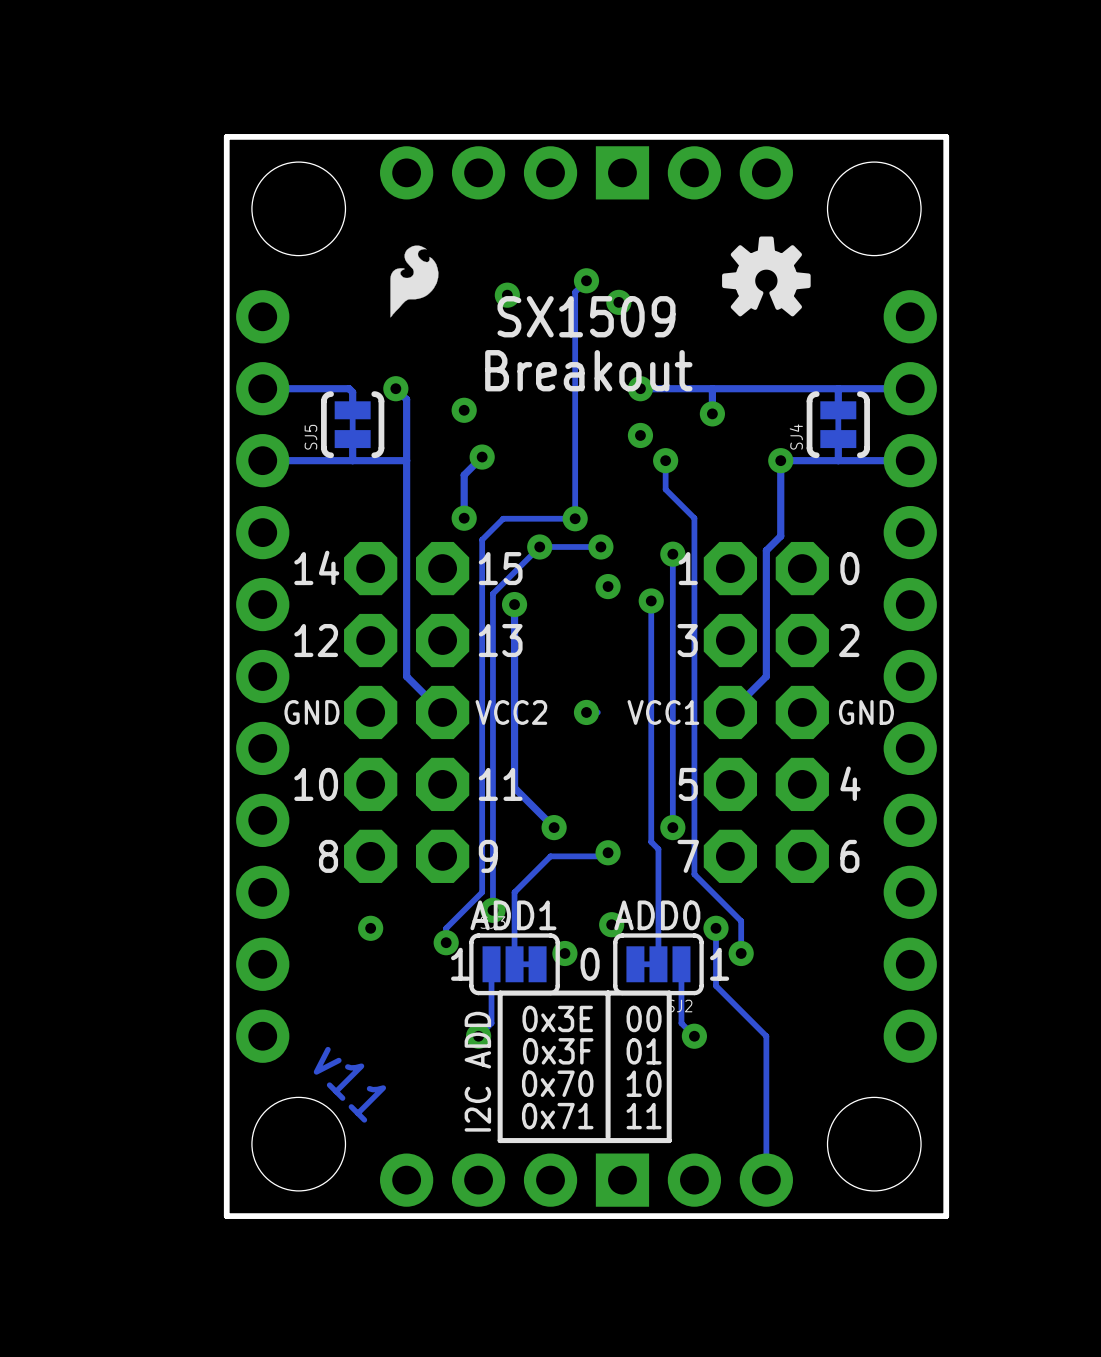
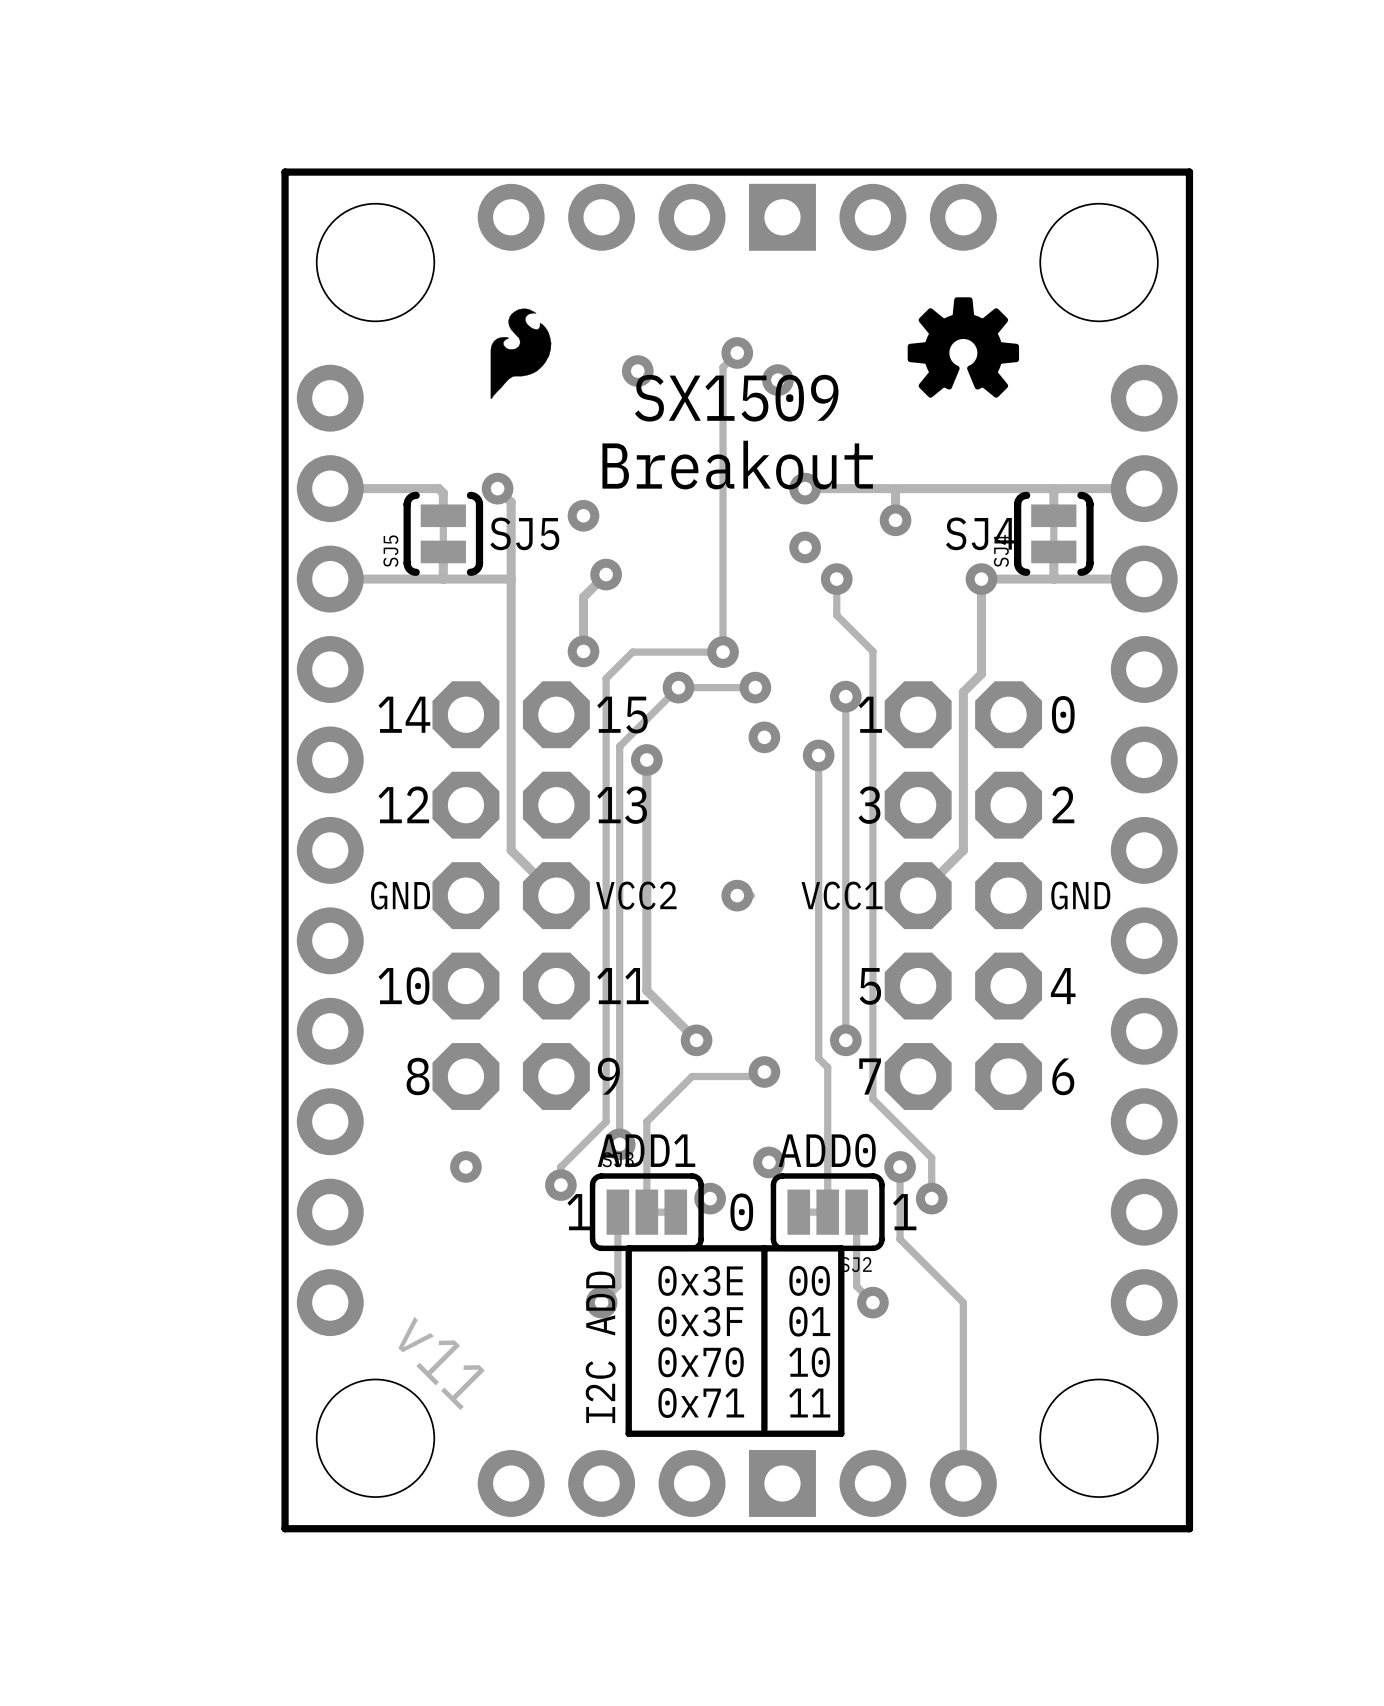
text: none -> SJ5 (524, 533)
text: none -> SJ4 (981, 533)

